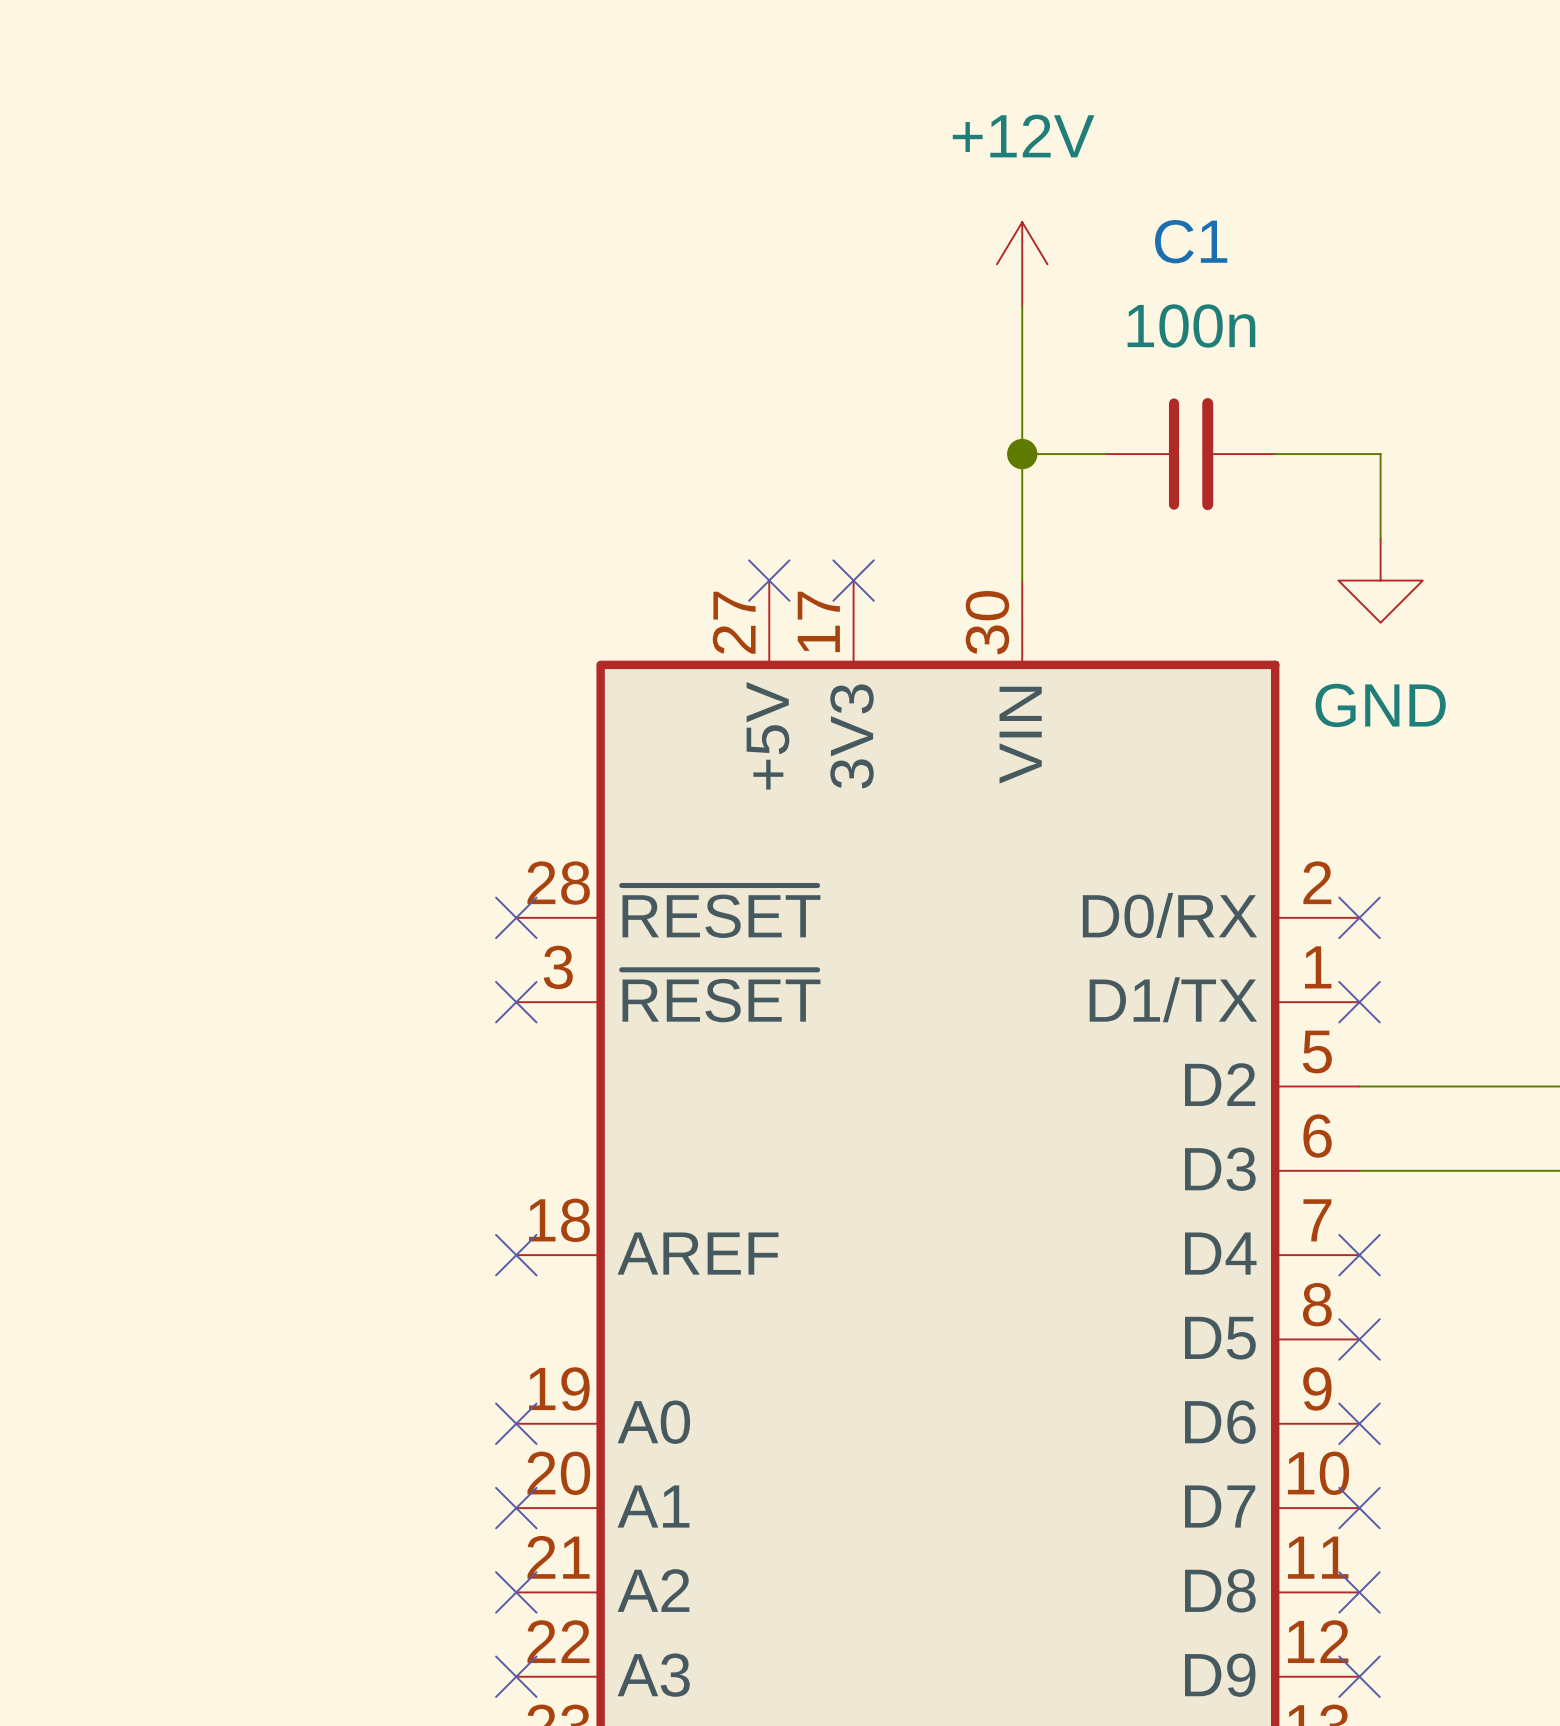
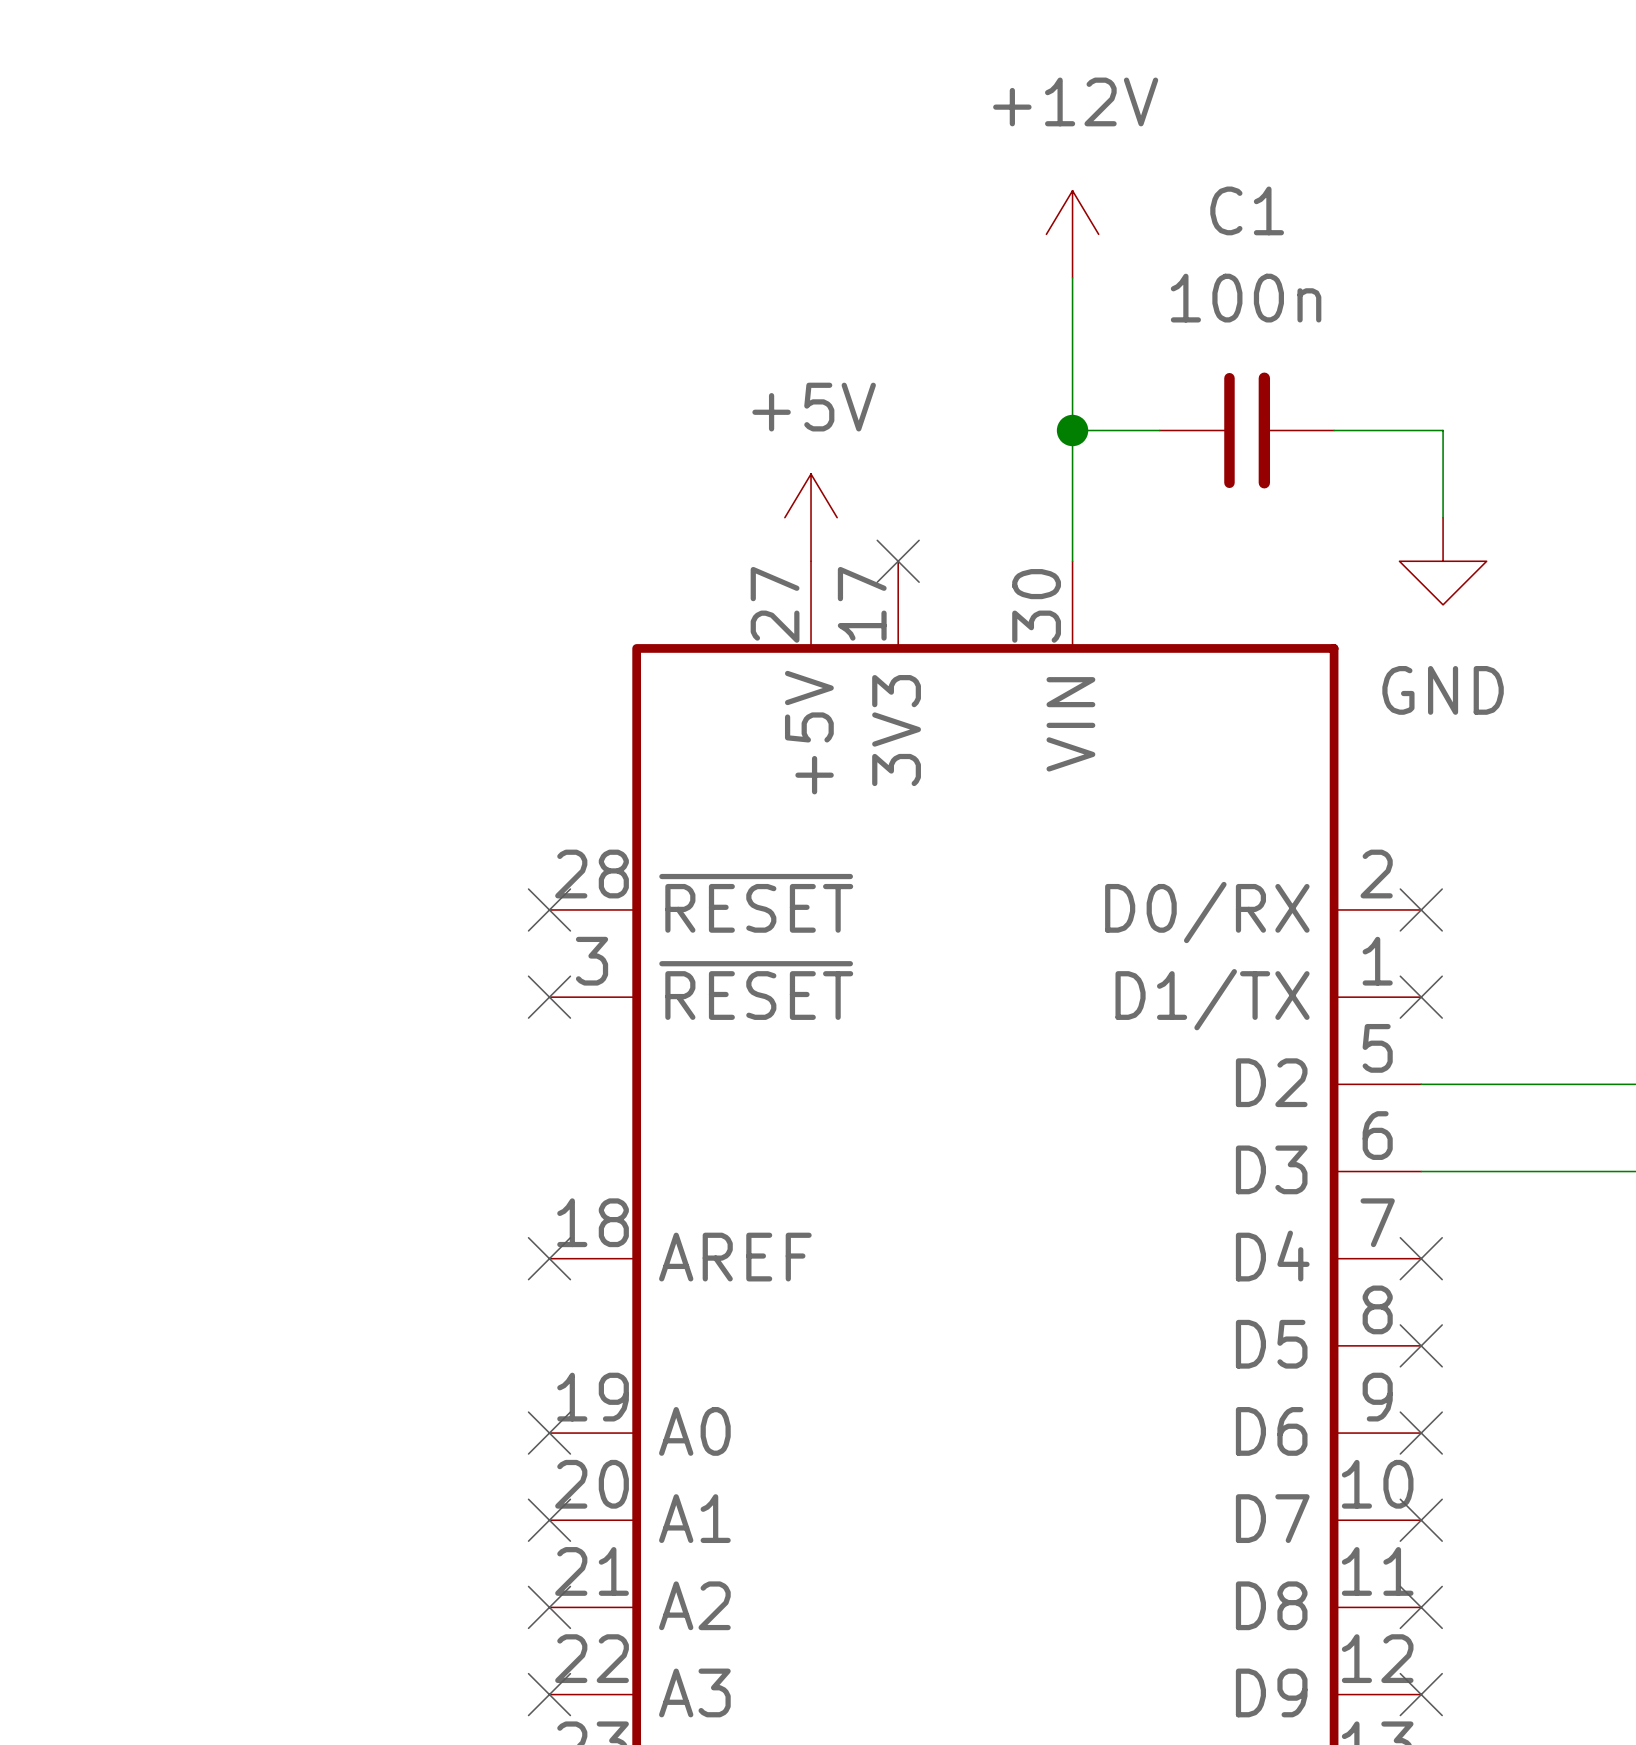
power symbol: none -> +5V (811, 517)
no-connect mark: (769, 580) -> none

